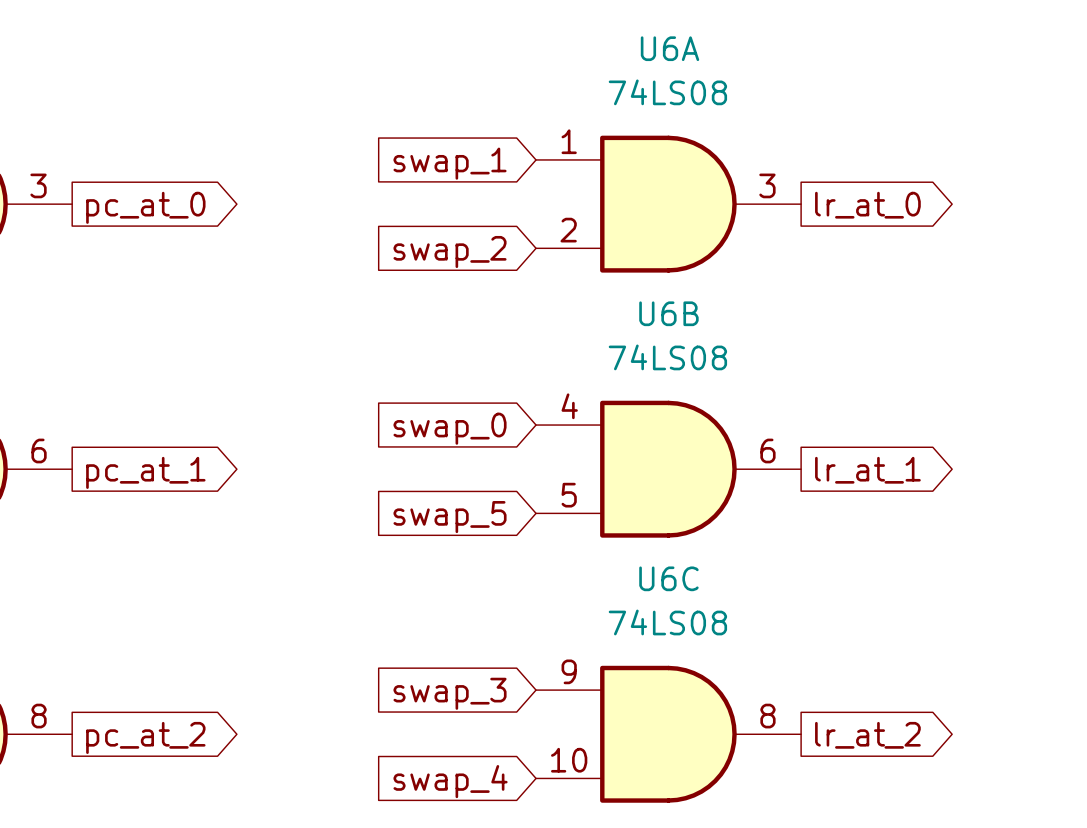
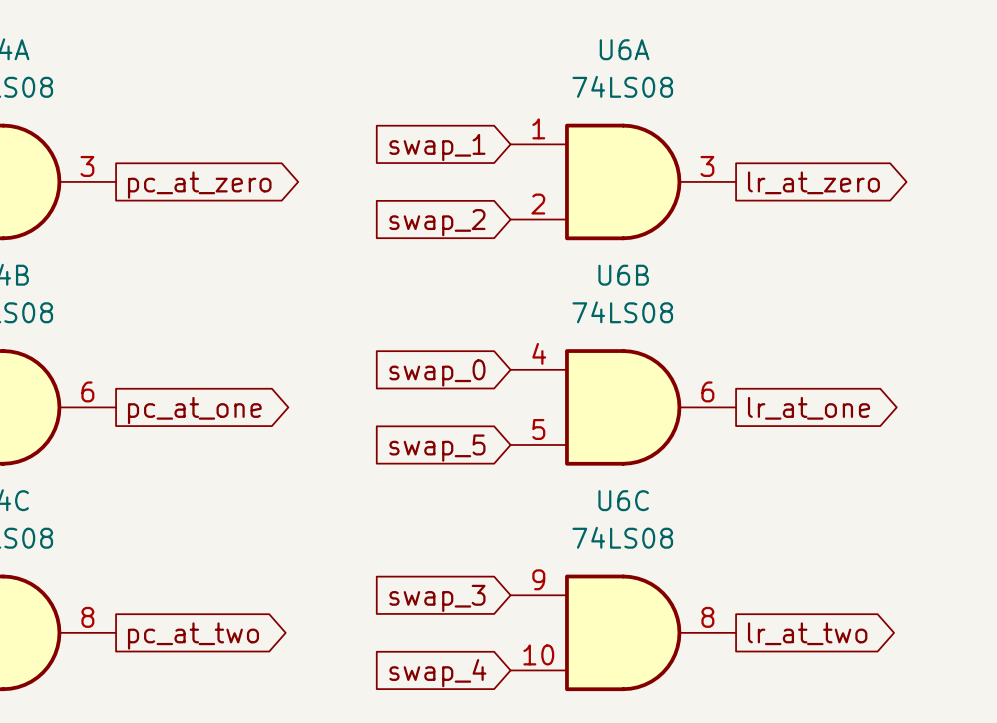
global label: lr_at_0 (867, 205) -> lr_at_zero (813, 182)
global label: pc_at_0 (145, 207) -> pc_at_zero (199, 185)
global label: lr_at_1 (867, 470) -> lr_at_one (809, 408)
global label: pc_at_1 (145, 472) -> pc_at_one (194, 410)
global label: lr_at_2 (867, 735) -> lr_at_two (807, 633)
global label: pc_at_2 (145, 737) -> pc_at_two (193, 635)

